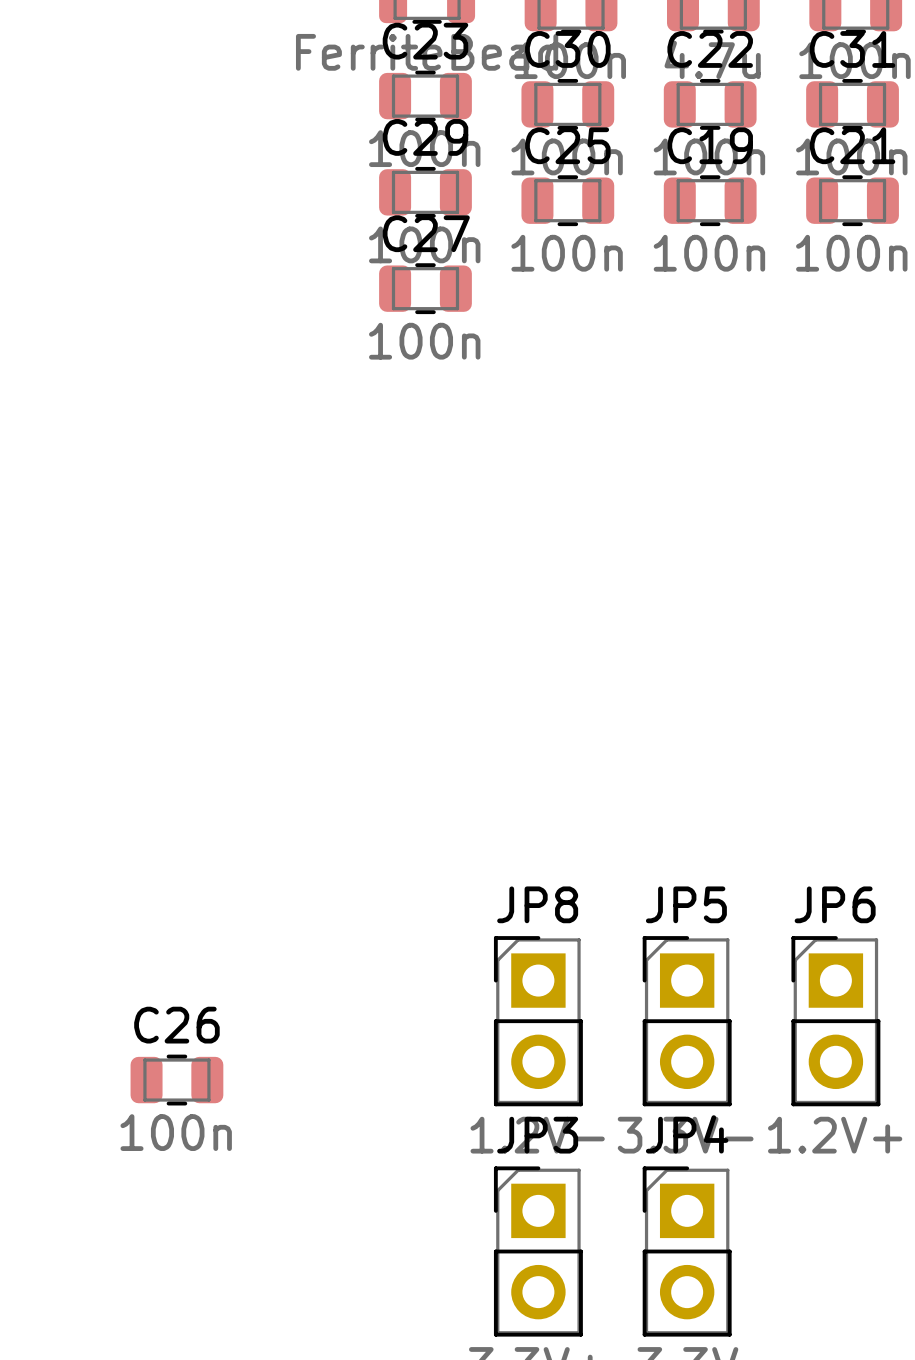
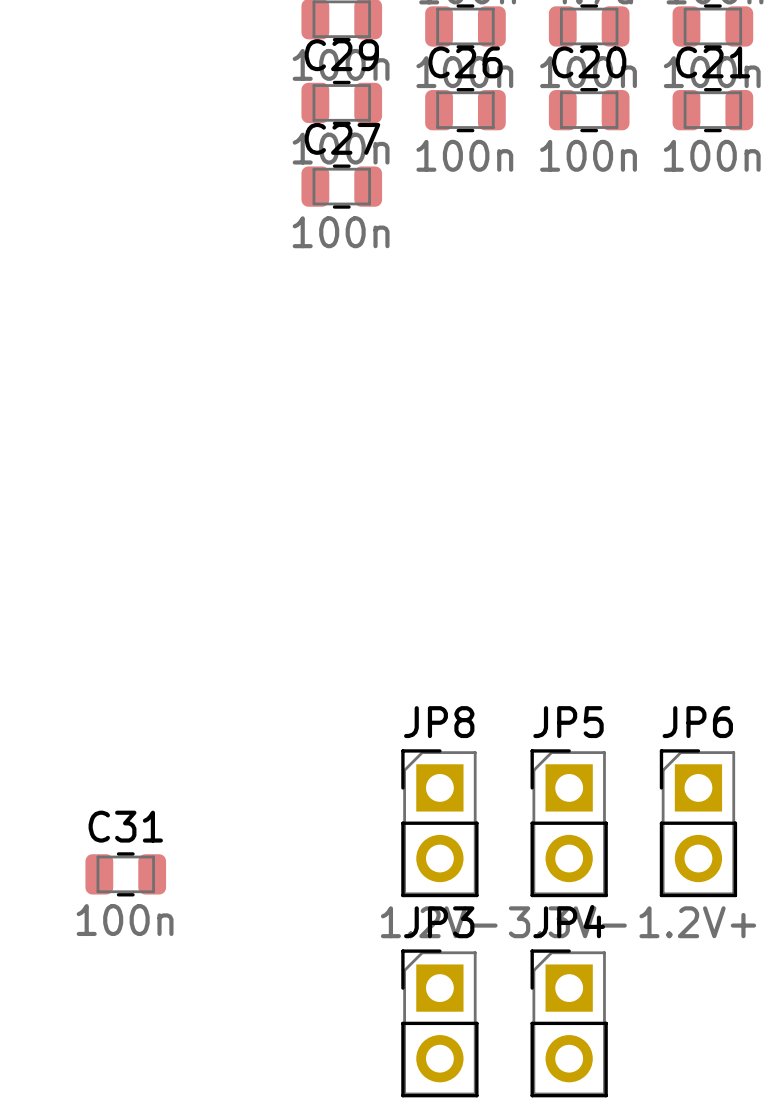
C25 name: C25 (567, 145) -> C26 (465, 62)
C19 name: C19 (710, 145) -> C20 (589, 62)
C26 name: C26 (176, 1025) -> C31 (125, 826)

